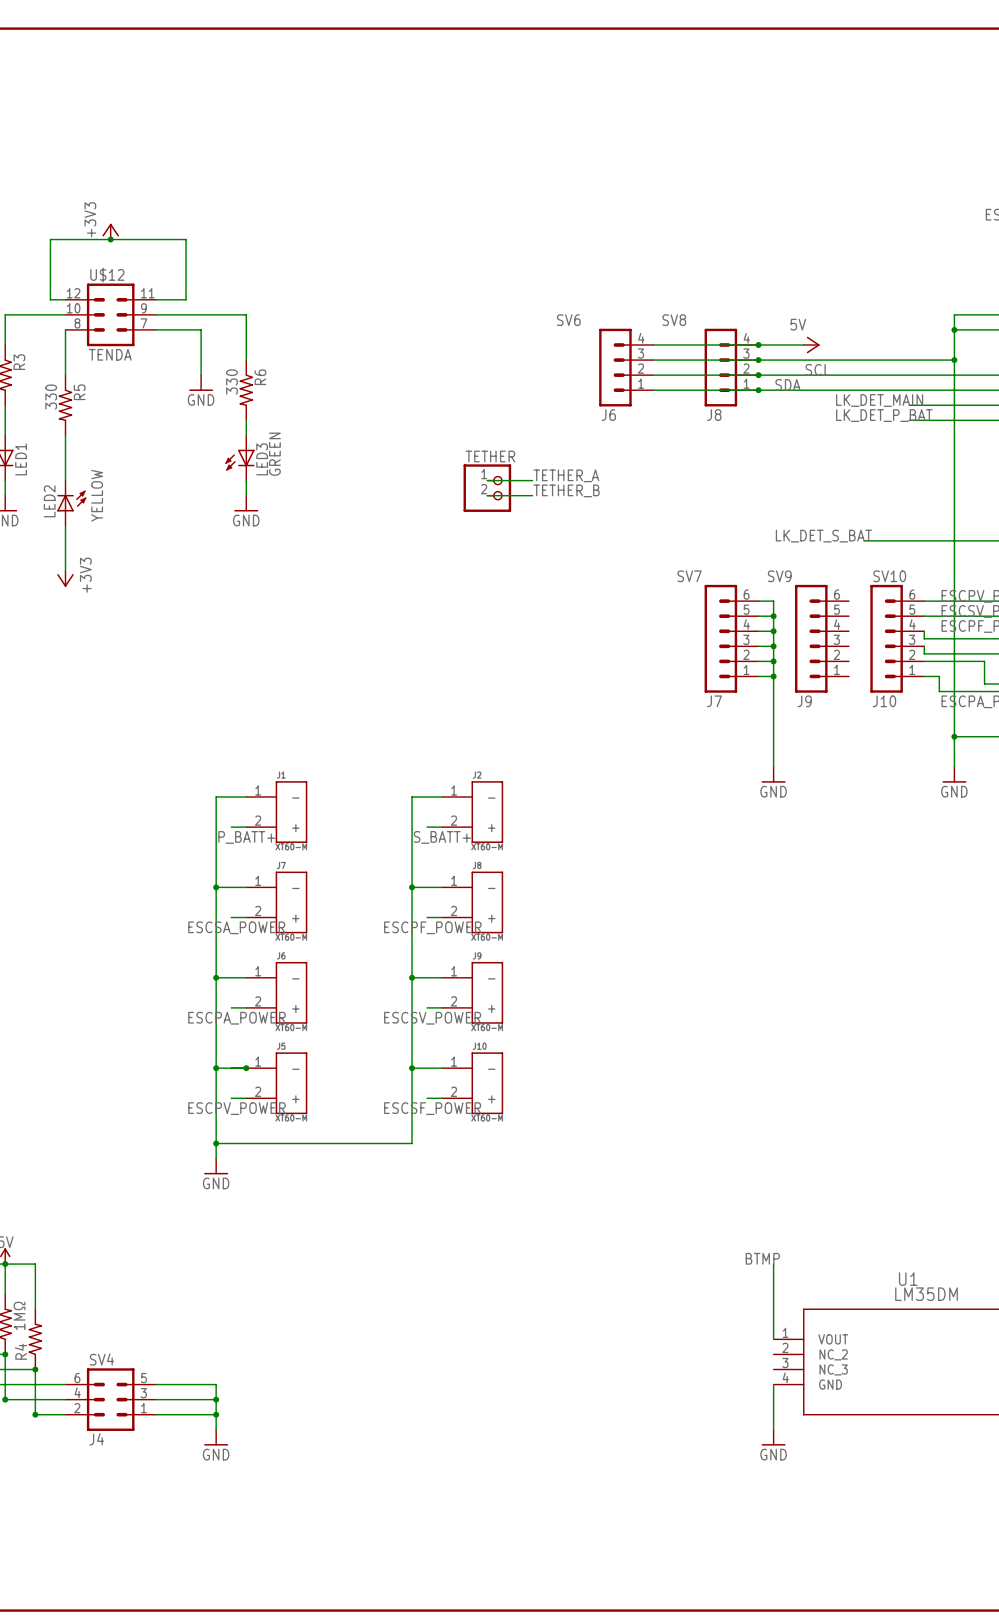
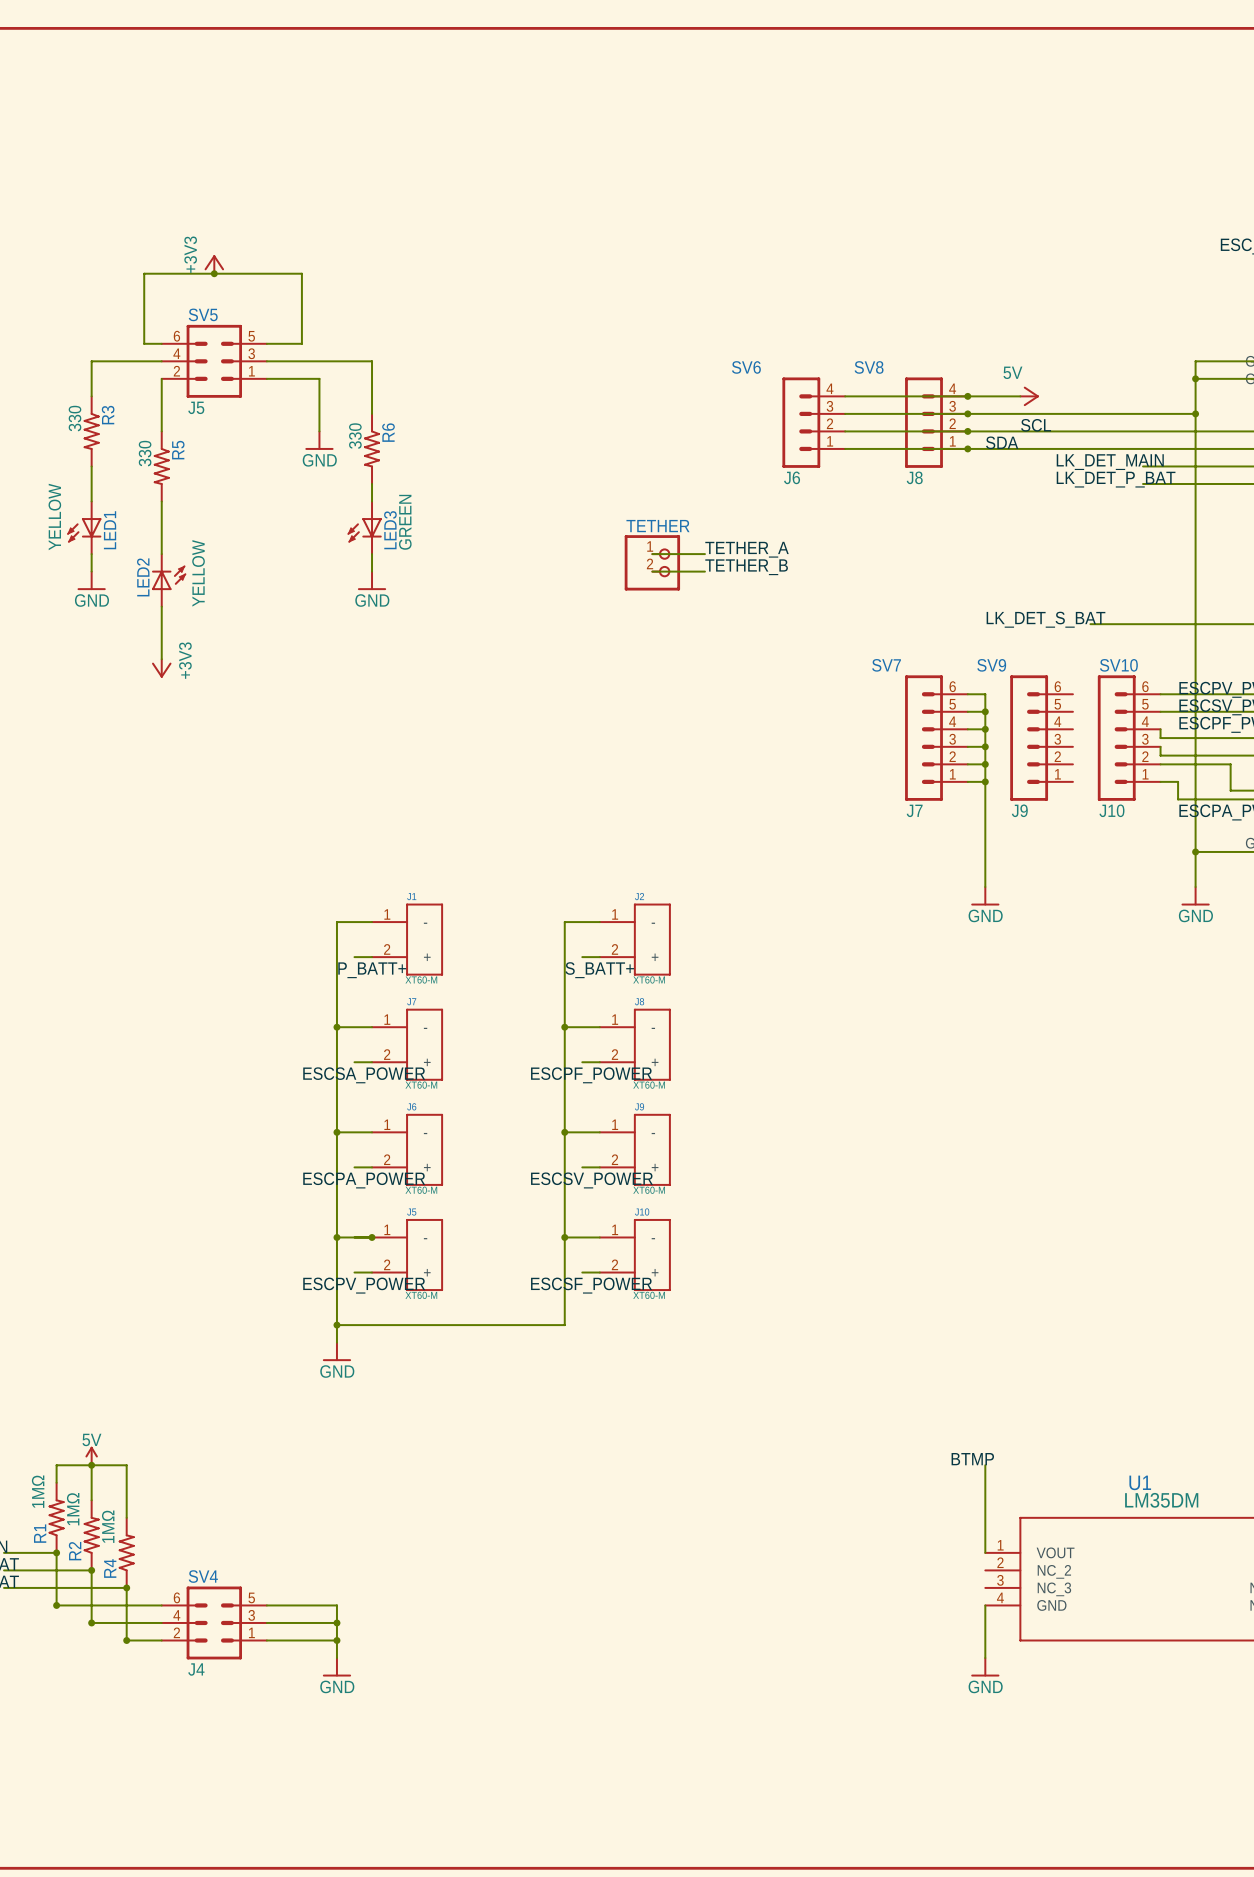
U$12 name: U$12 (107, 274) -> SV5 (203, 314)
U$12 pin number: 12 (73, 293) -> 6 (176, 336)
U$12 pin number: 11 (147, 293) -> 5 (251, 336)
U$12 pin number: 10 (73, 308) -> 4 (176, 353)
U$12 pin number: 9 (143, 308) -> 3 (251, 353)
U$12 pin number: 8 (77, 323) -> 2 (176, 371)
U$12 pin number: 7 (143, 323) -> 1 (251, 371)
U$12 value: TENDA (110, 354) -> J5 (196, 407)

